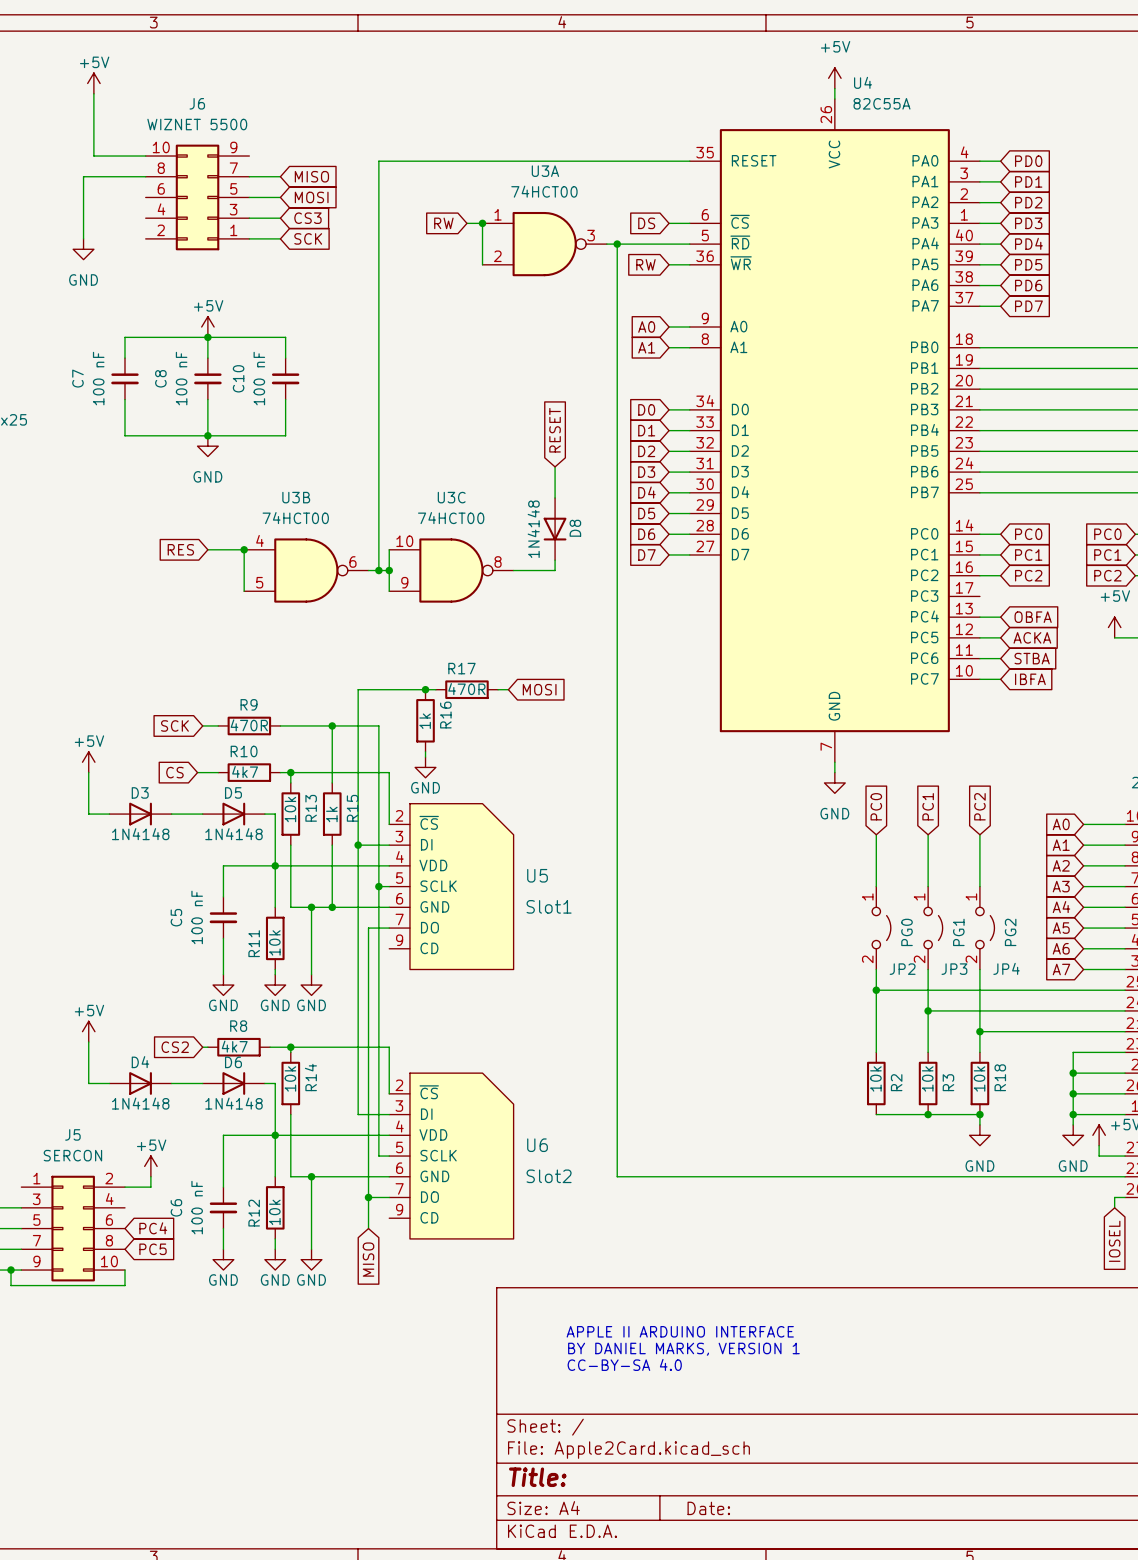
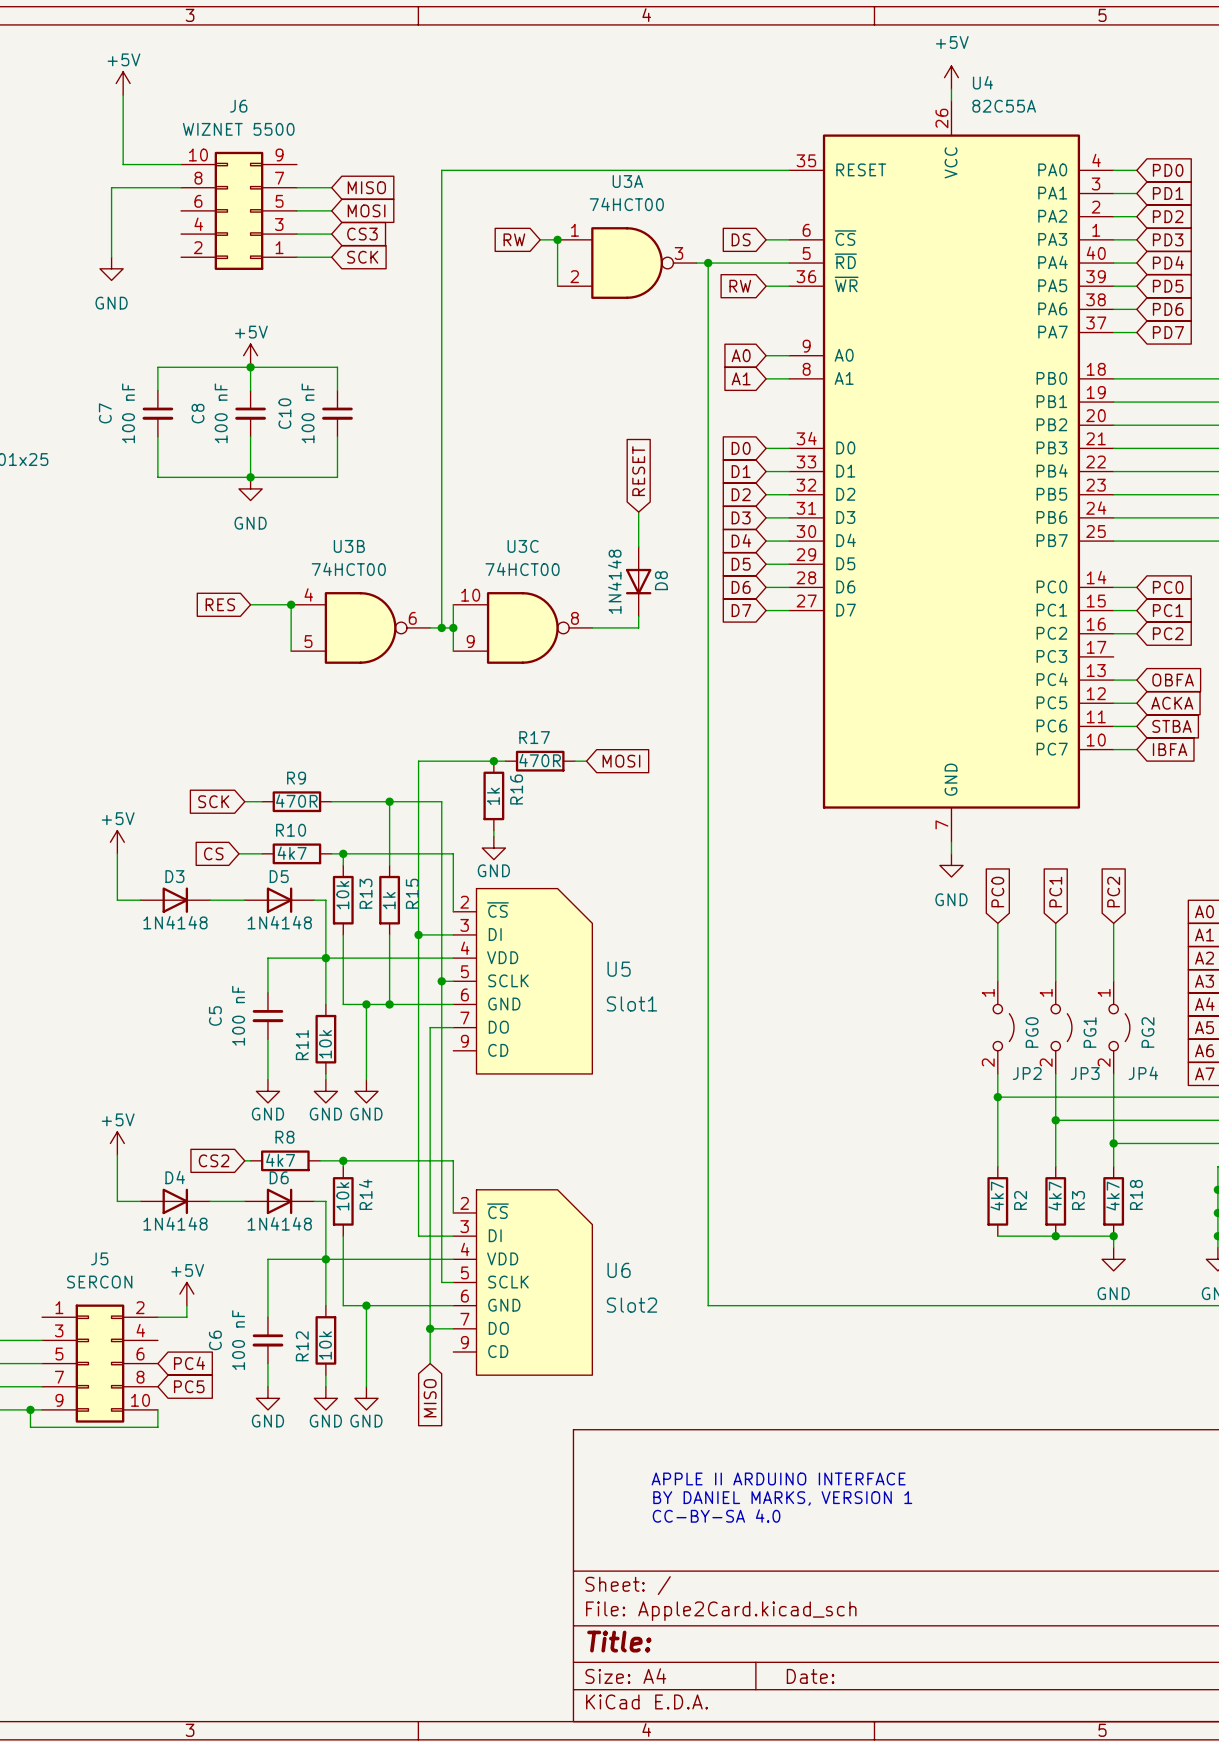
R2 value: 10k (875, 1078) -> 4k7 (997, 1196)
R3 value: 10k (927, 1078) -> 4k7 (1055, 1196)
R18 value: 10k (979, 1078) -> 4k7 (1112, 1196)

